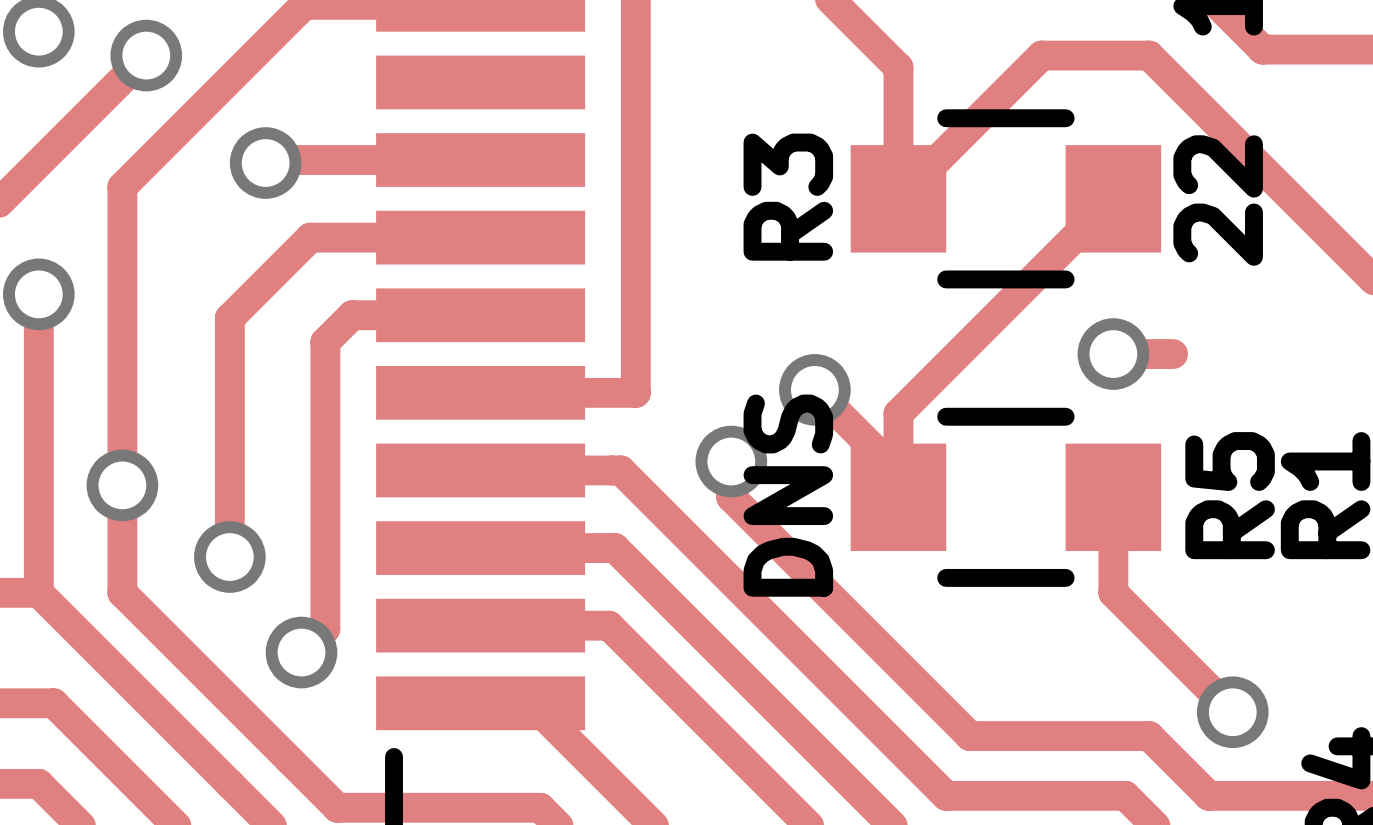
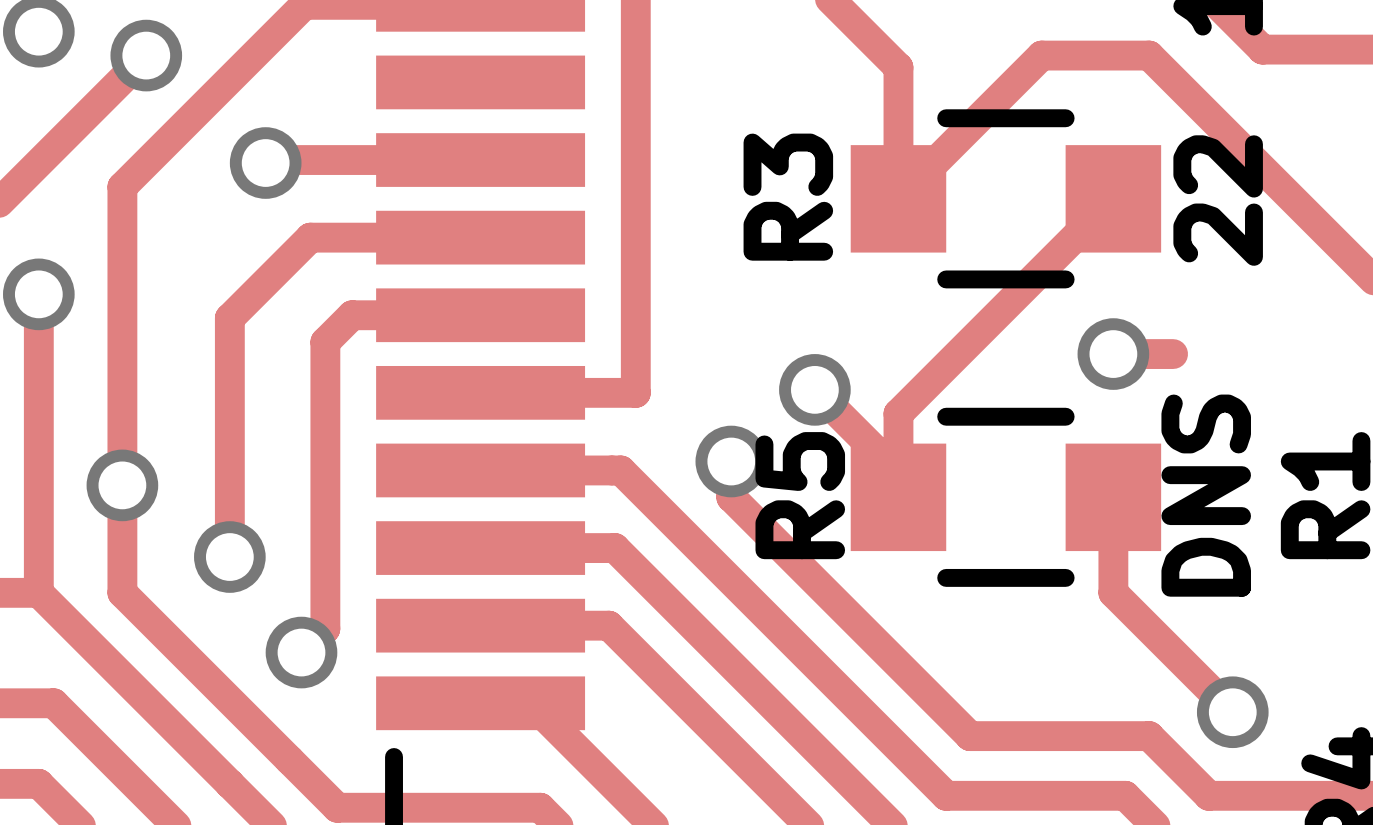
R5 value position: DNS (788, 495) -> DNS (1206, 495)
R5 name position: R5 (1230, 495) -> R5 (800, 495)

